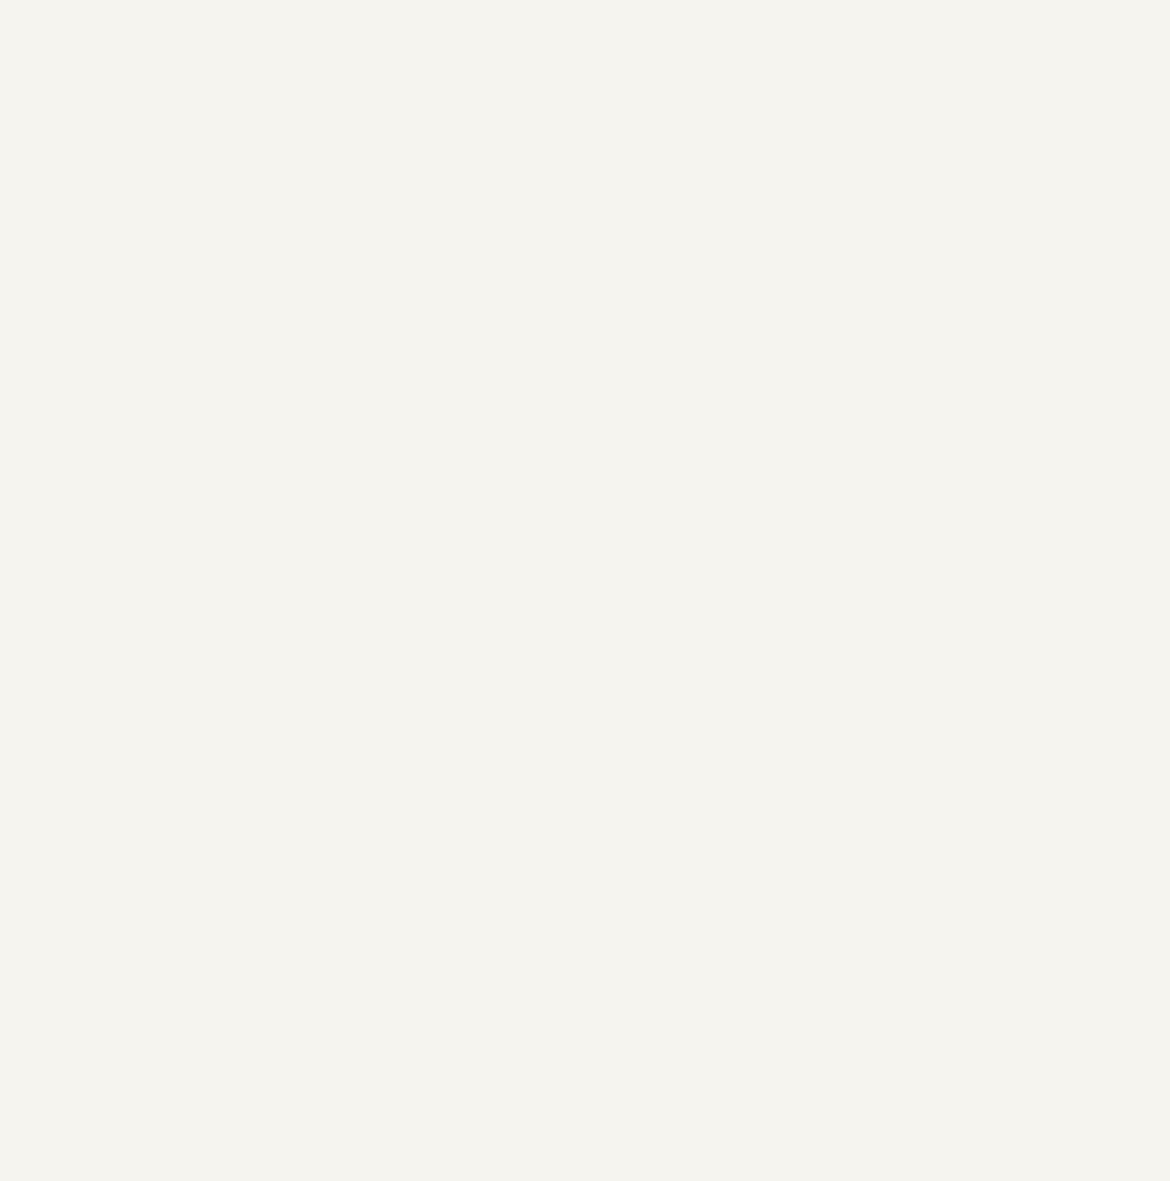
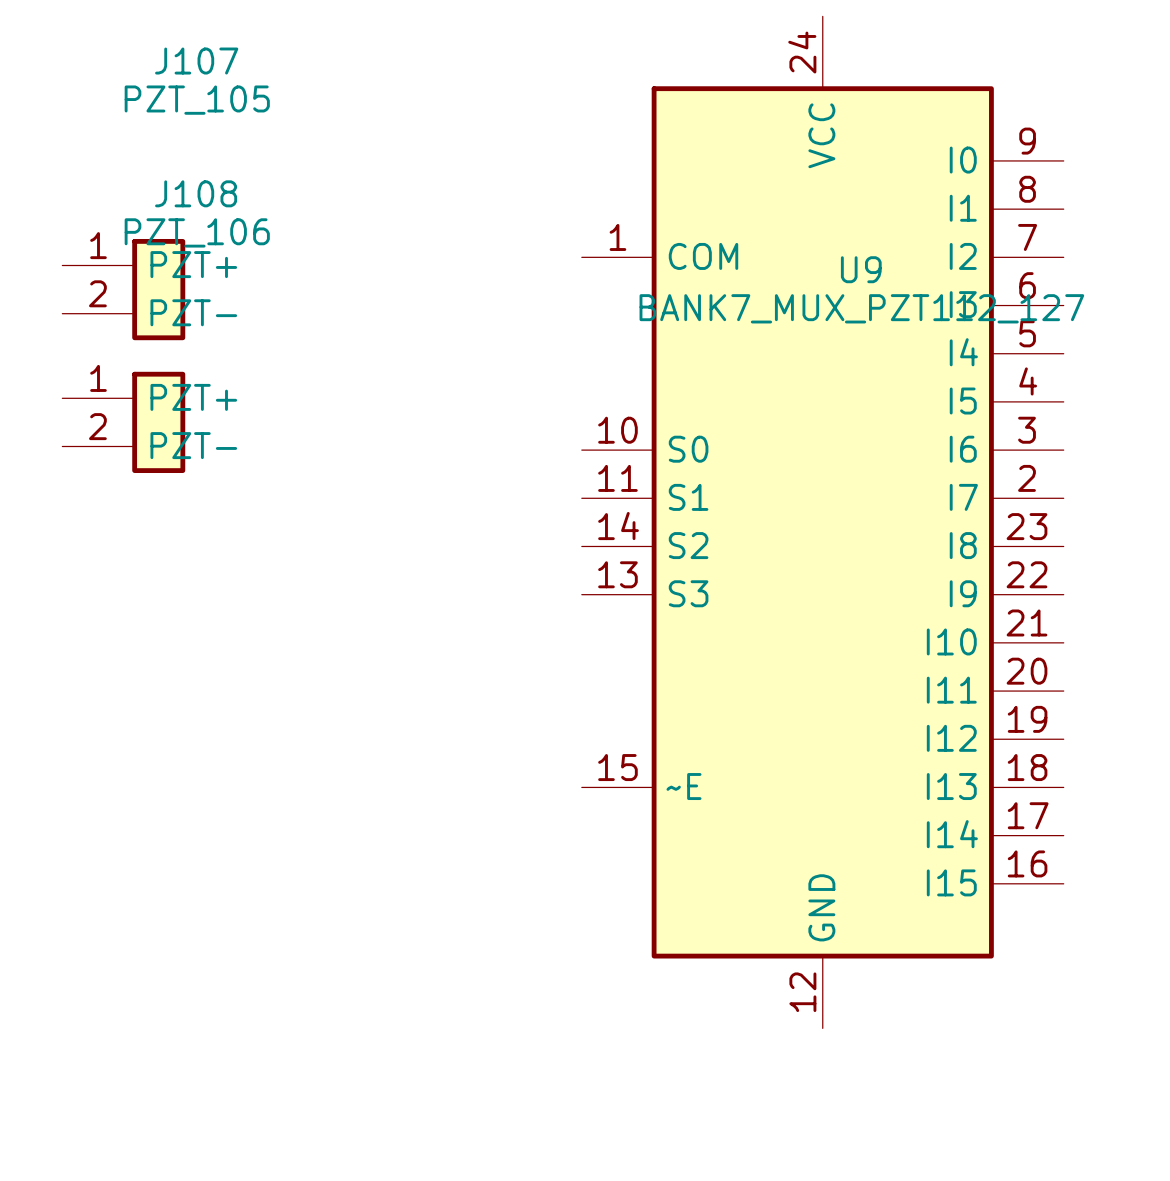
J107: none -> PZT_105 (123, 289)
J108: none -> PZT_106 (123, 422)
U9: none -> BANK7_MUX_PZT112_127 (822, 522)

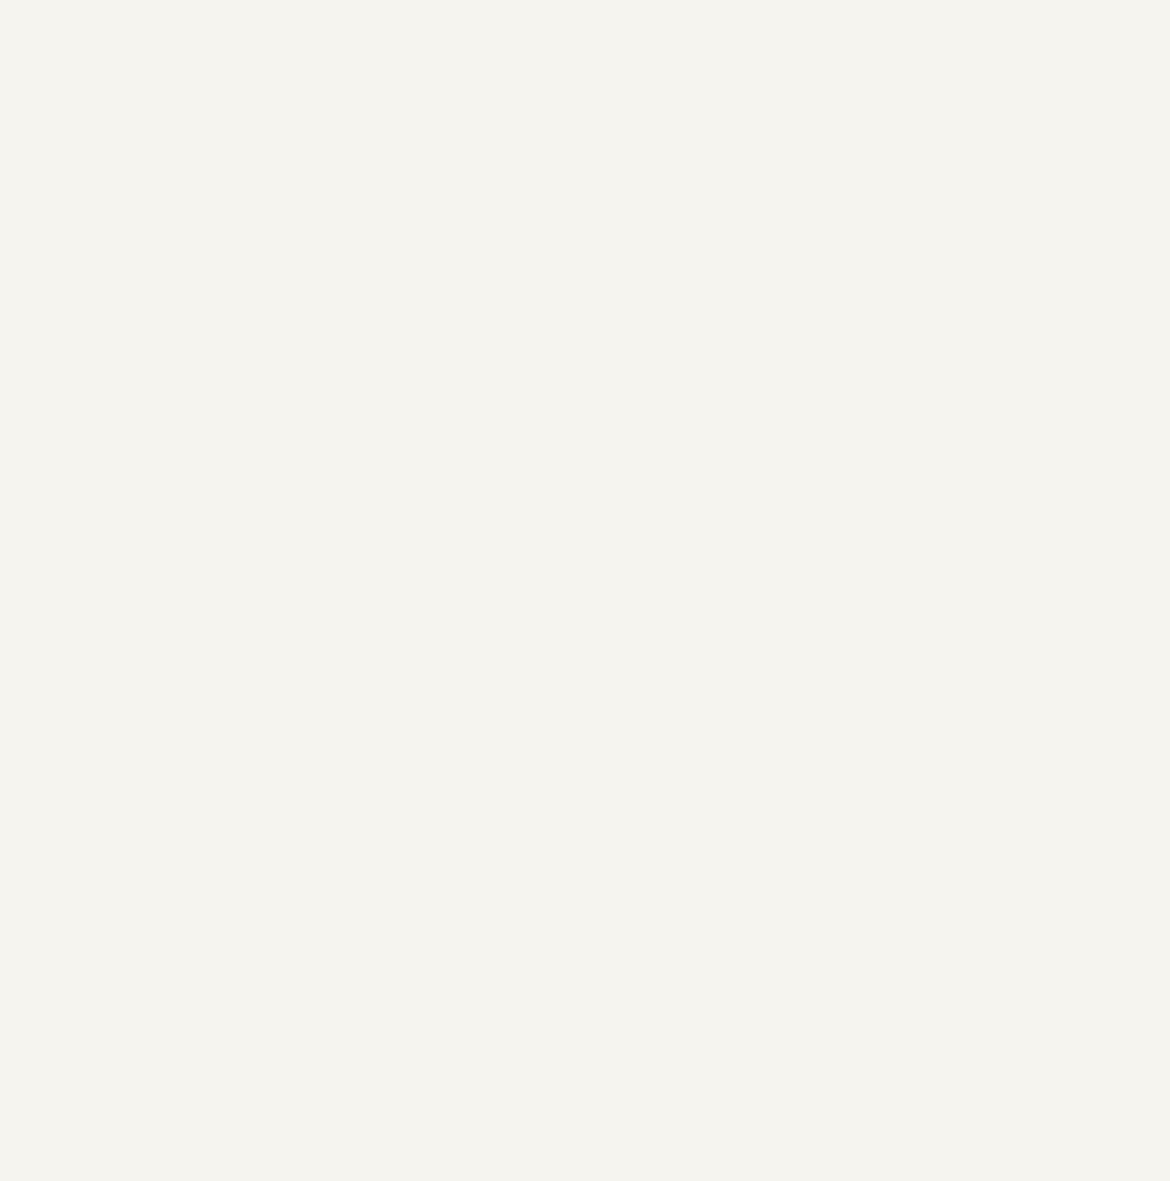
J107: PZT_105 (123, 289) -> none
J108: PZT_106 (123, 422) -> none
U9: BANK7_MUX_PZT112_127 (822, 522) -> none

